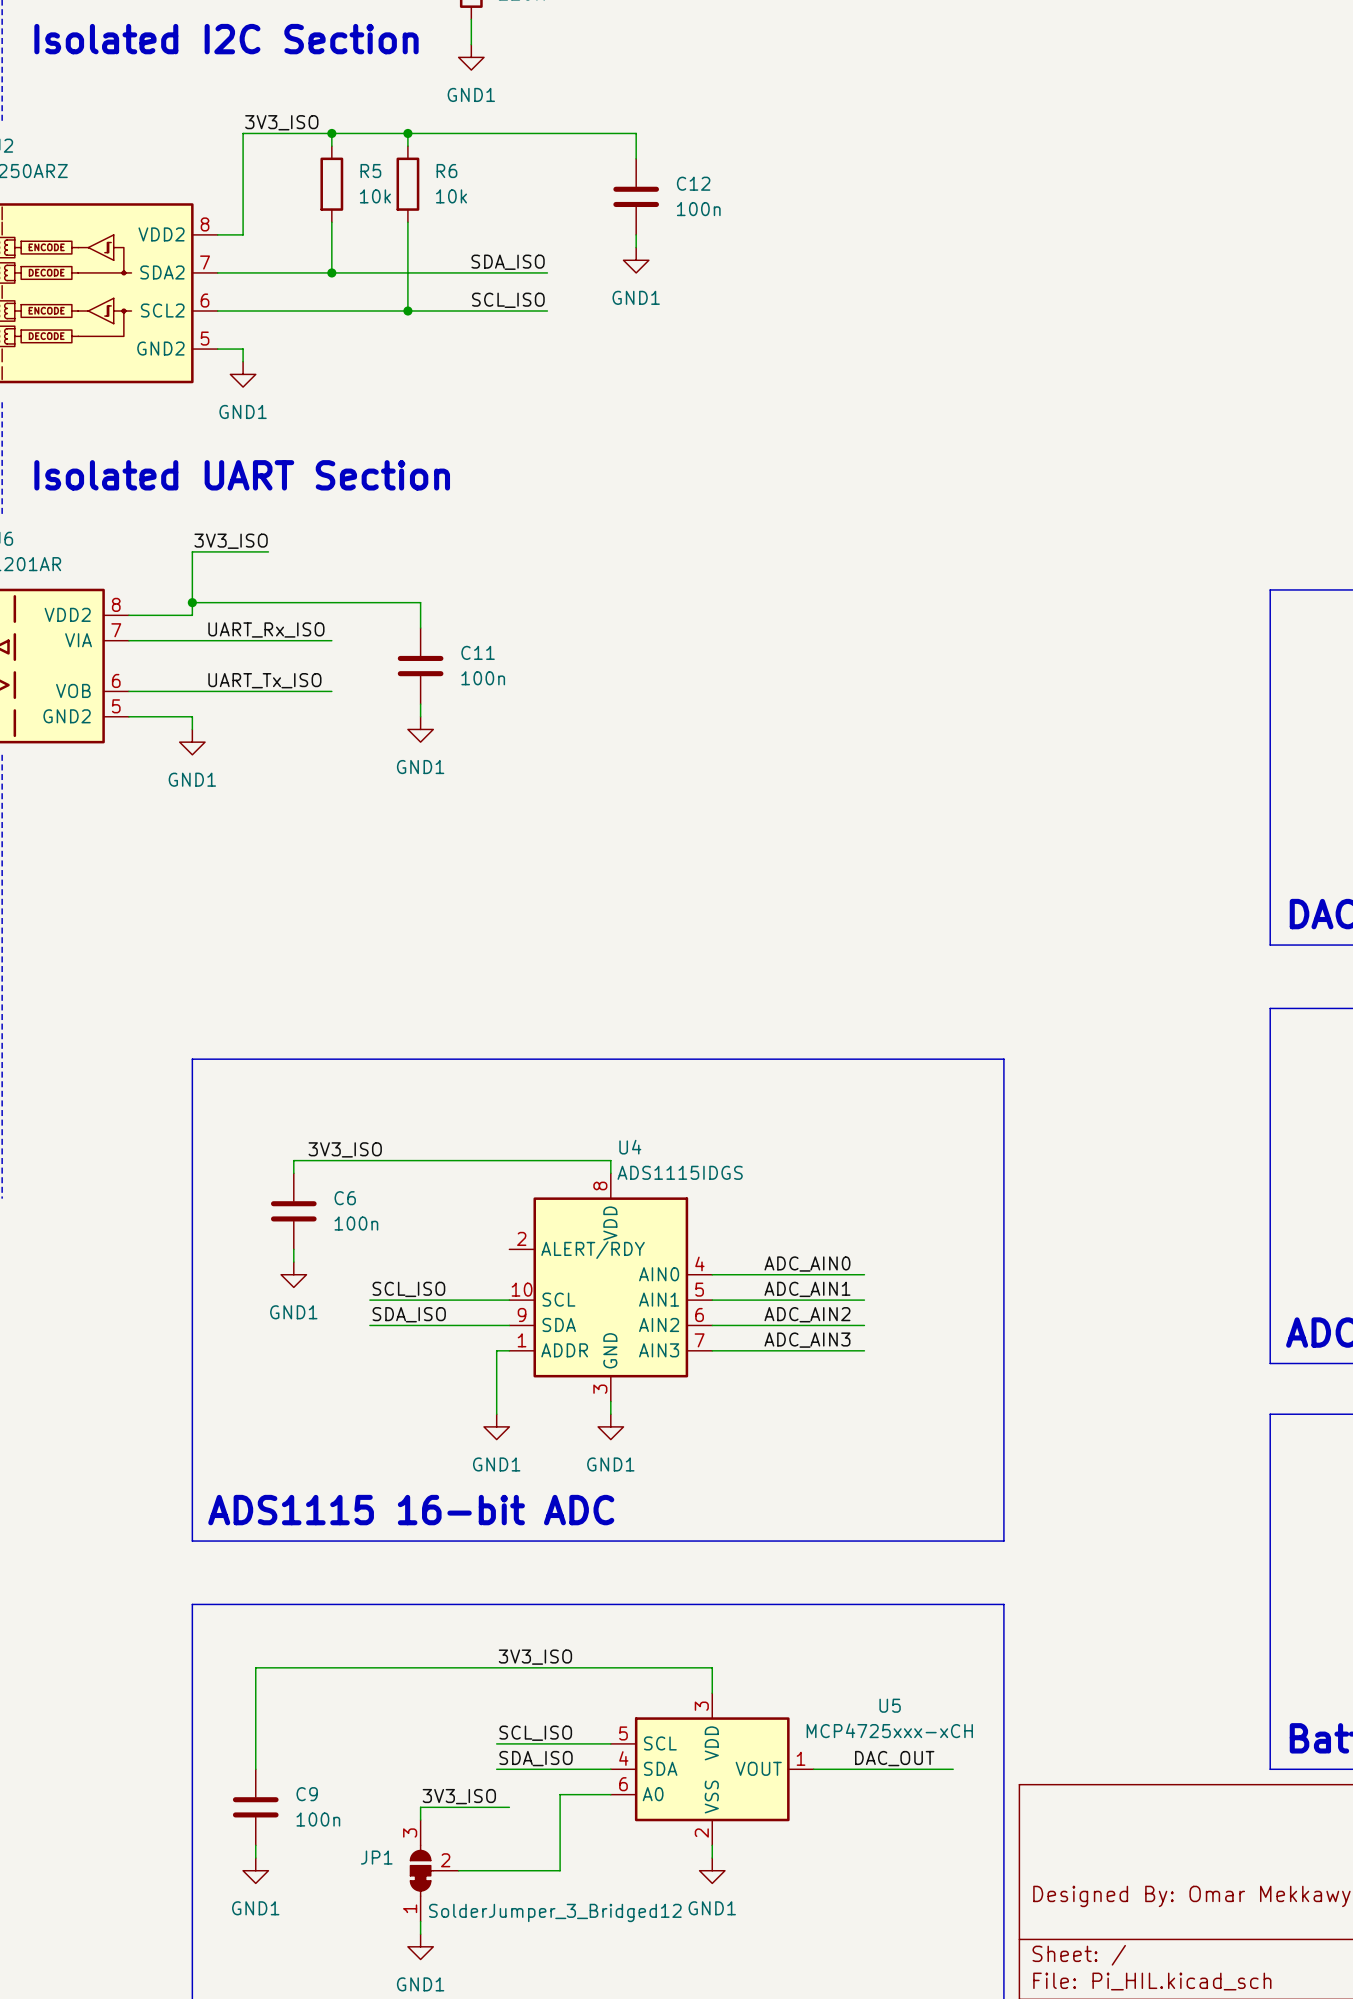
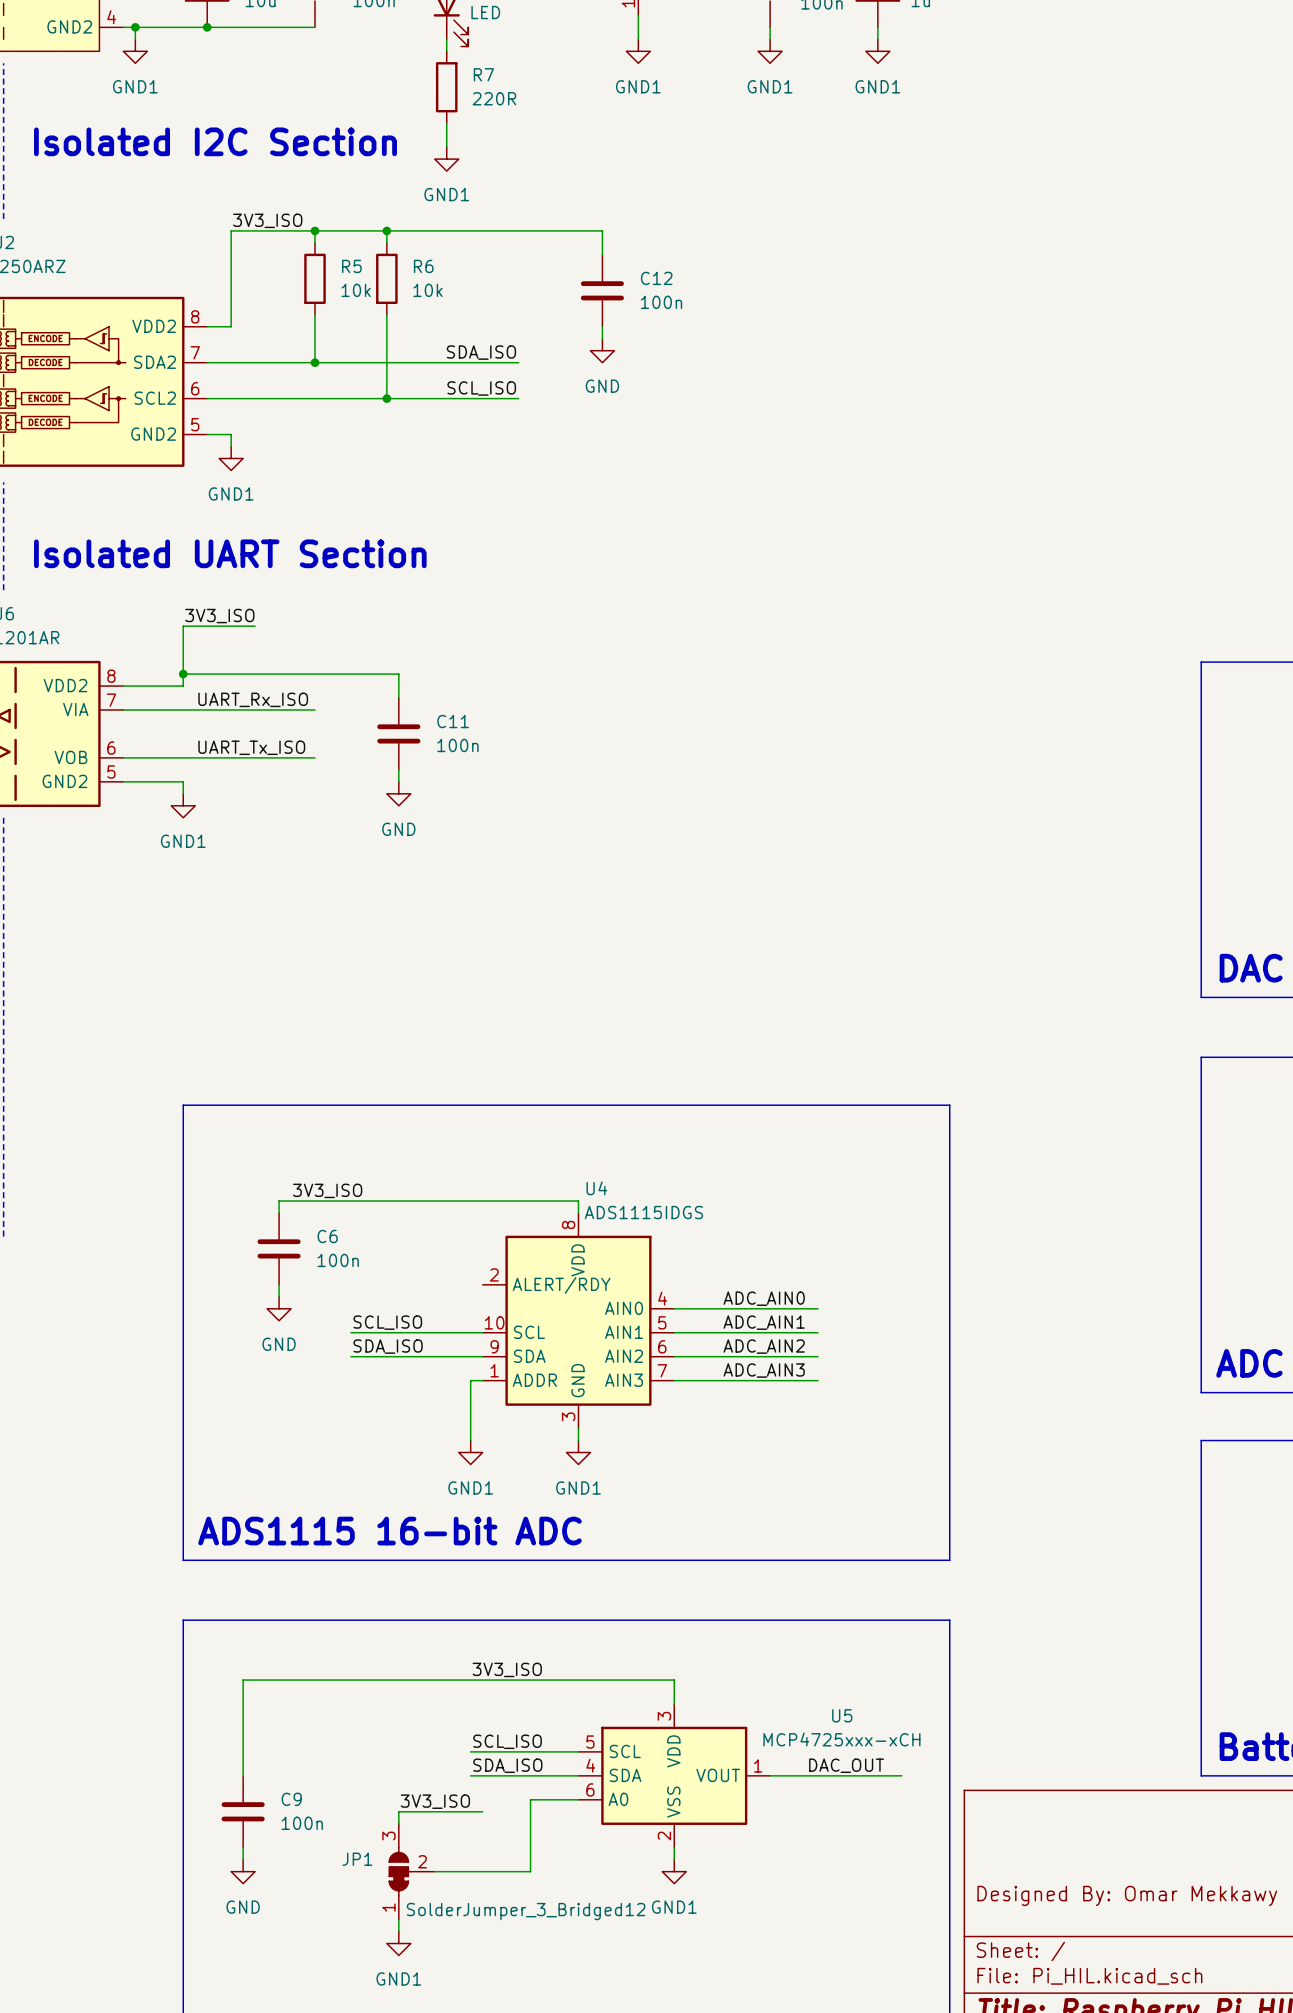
power symbol: GND1 (636, 260) -> GND (602, 350)
power symbol: GND1 (420, 729) -> GND (398, 793)
power symbol: GND1 (293, 1274) -> GND (279, 1308)
power symbol: GND1 (255, 1870) -> GND (243, 1871)

